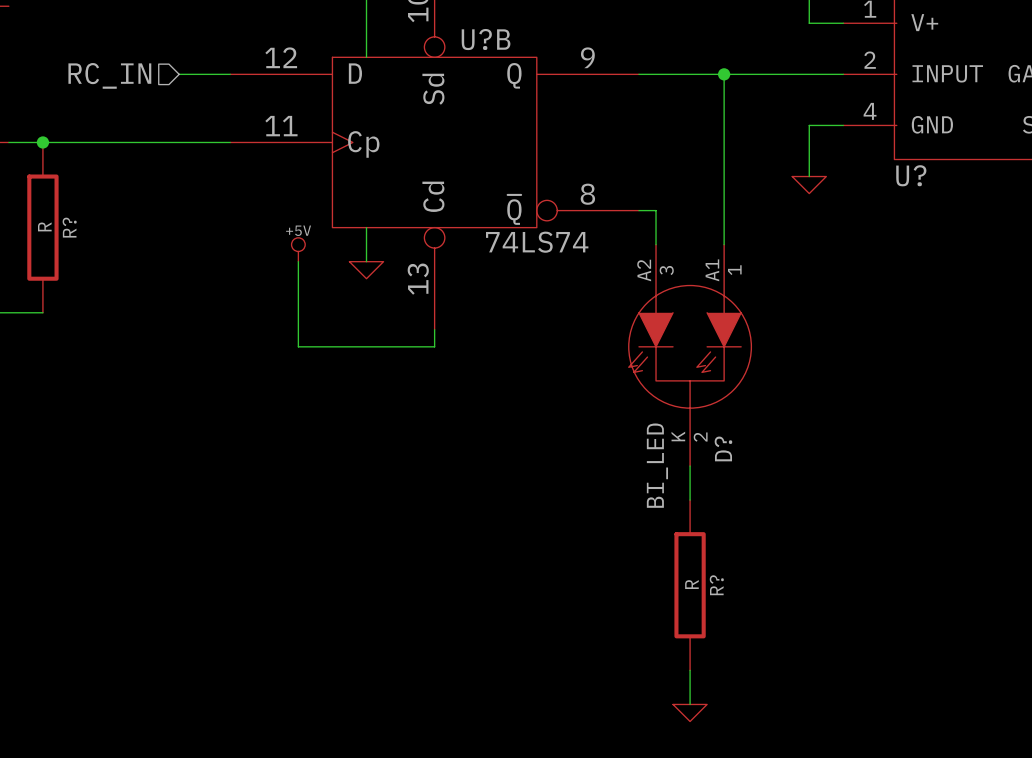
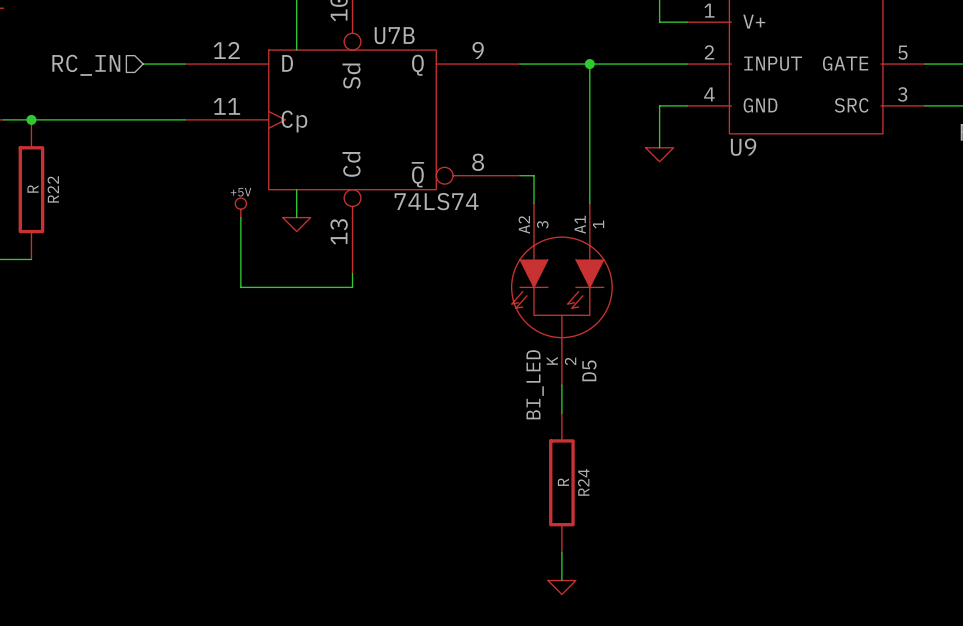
U?B name: U?B (486, 39) -> U7B (394, 35)
U? name: U? (911, 175) -> U9 (743, 147)
R? name: R? (69, 227) -> R22 (53, 189)
D? name: D? (723, 448) -> D5 (589, 370)
R? name: R? (716, 585) -> R24 (583, 482)

